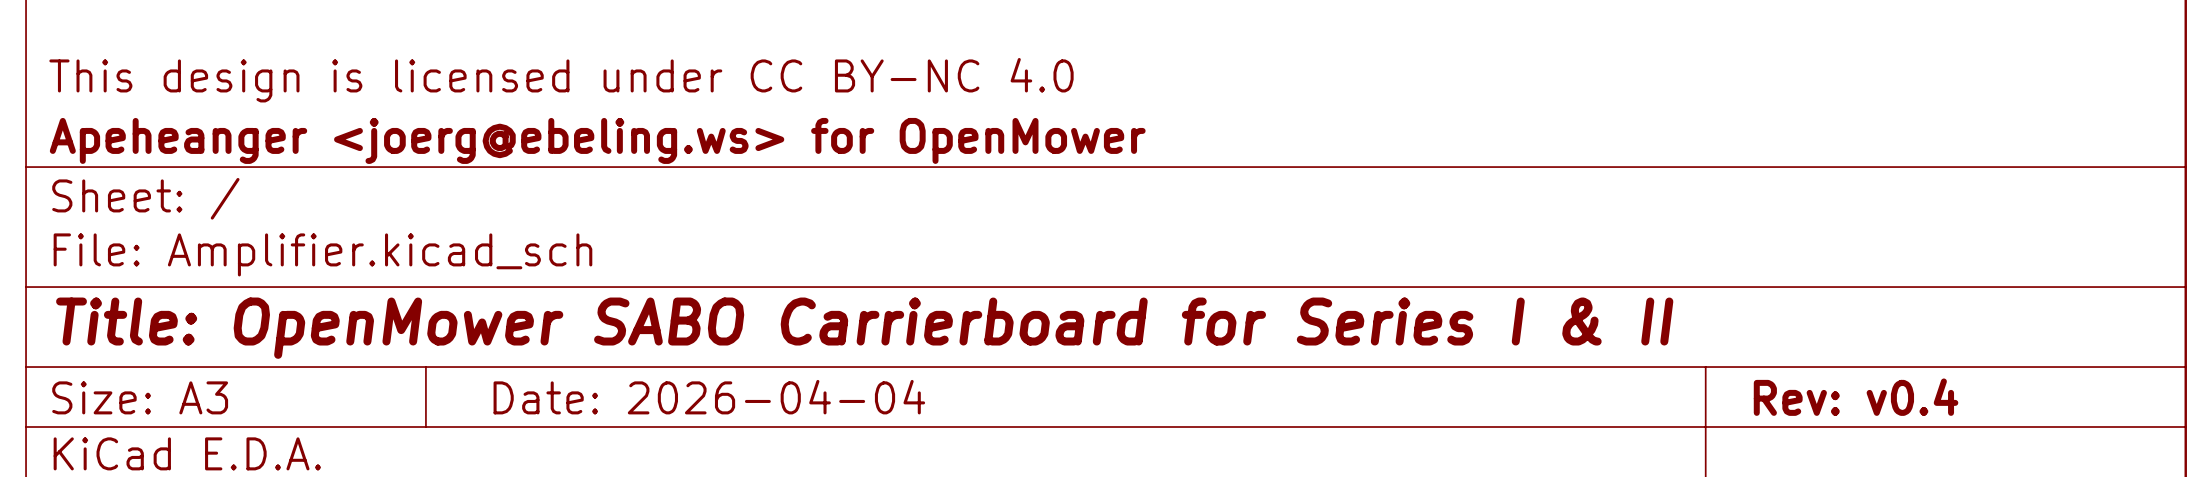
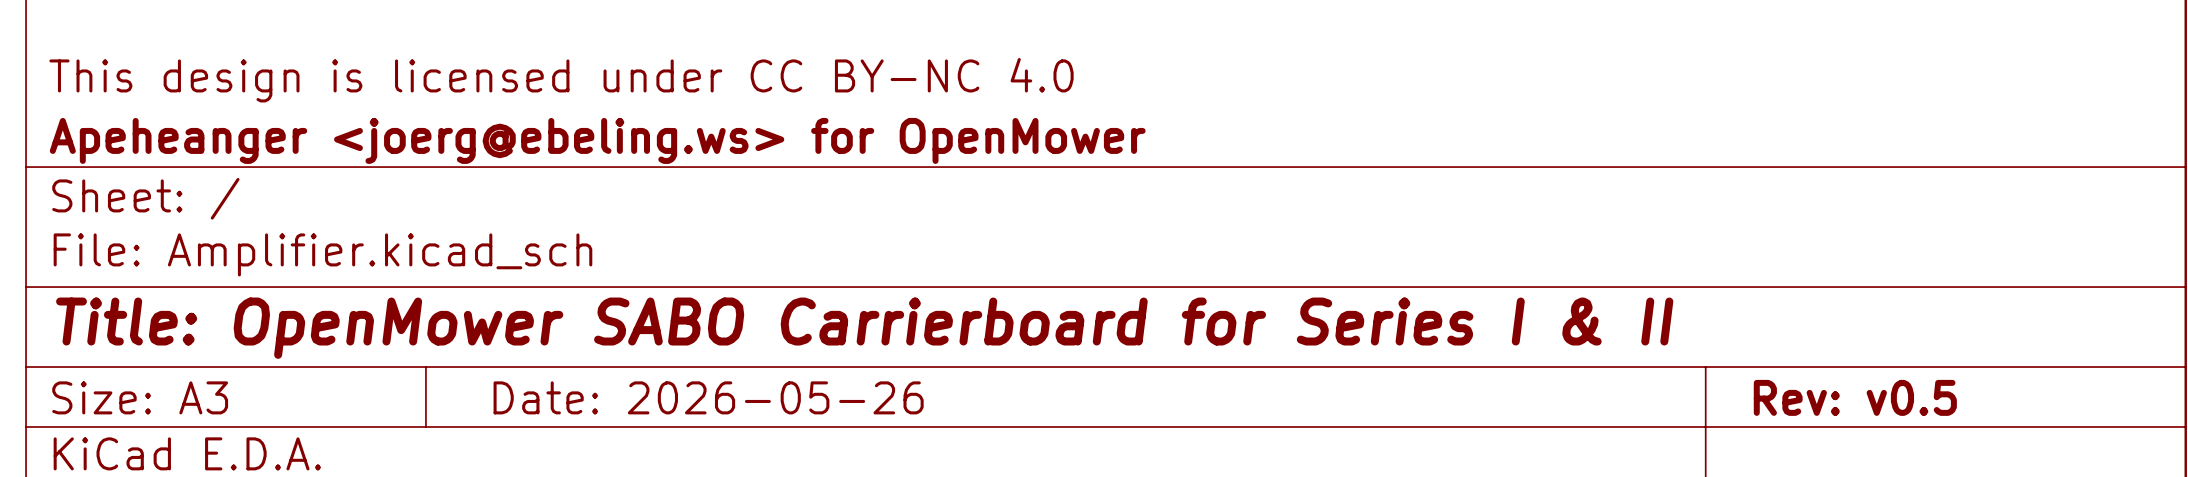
title block: Date: 2026-04-04 (709, 397) -> Date: 2026-05-26 (708, 397)
title block: Rev: v0.4 (1856, 397) -> Rev: v0.5 (1855, 397)

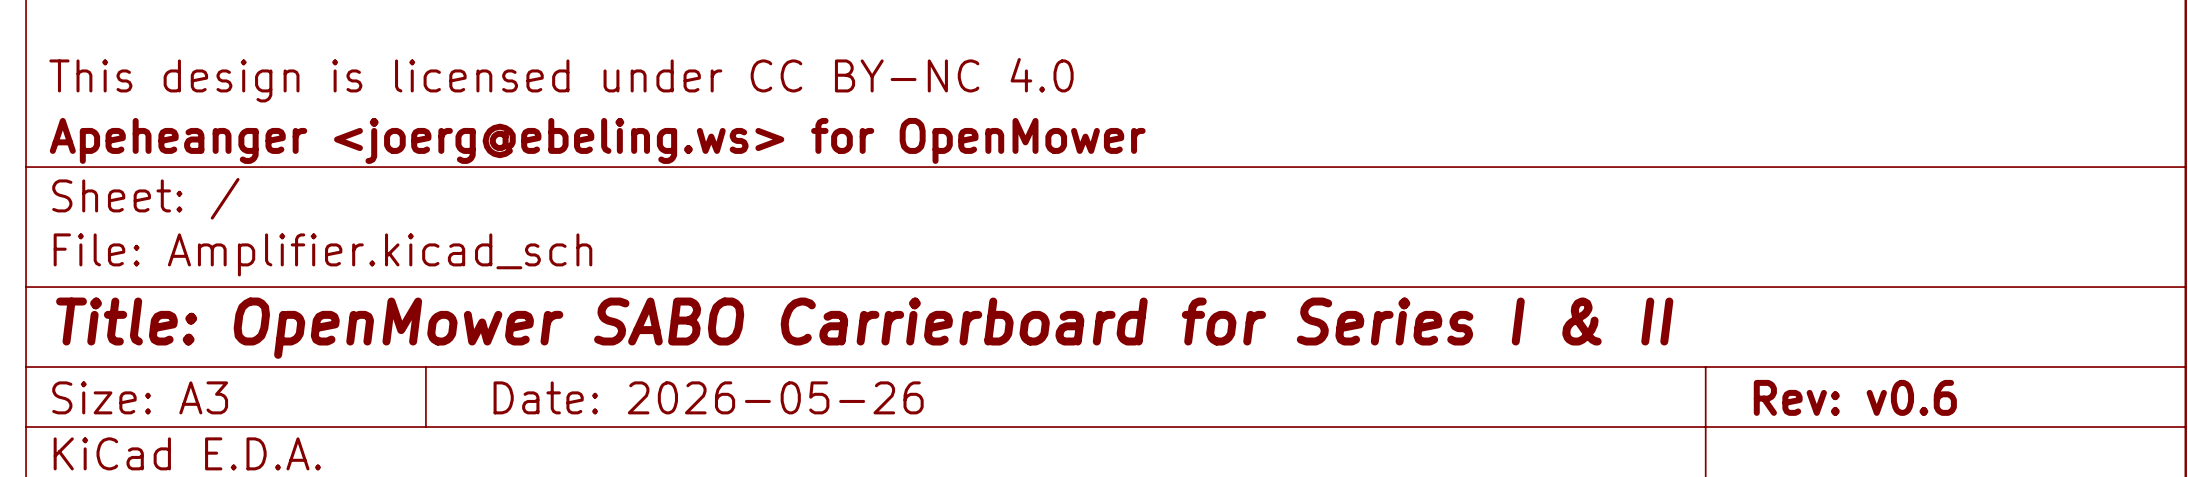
title block: Rev: v0.5 (1855, 397) -> Rev: v0.6 (1855, 397)

